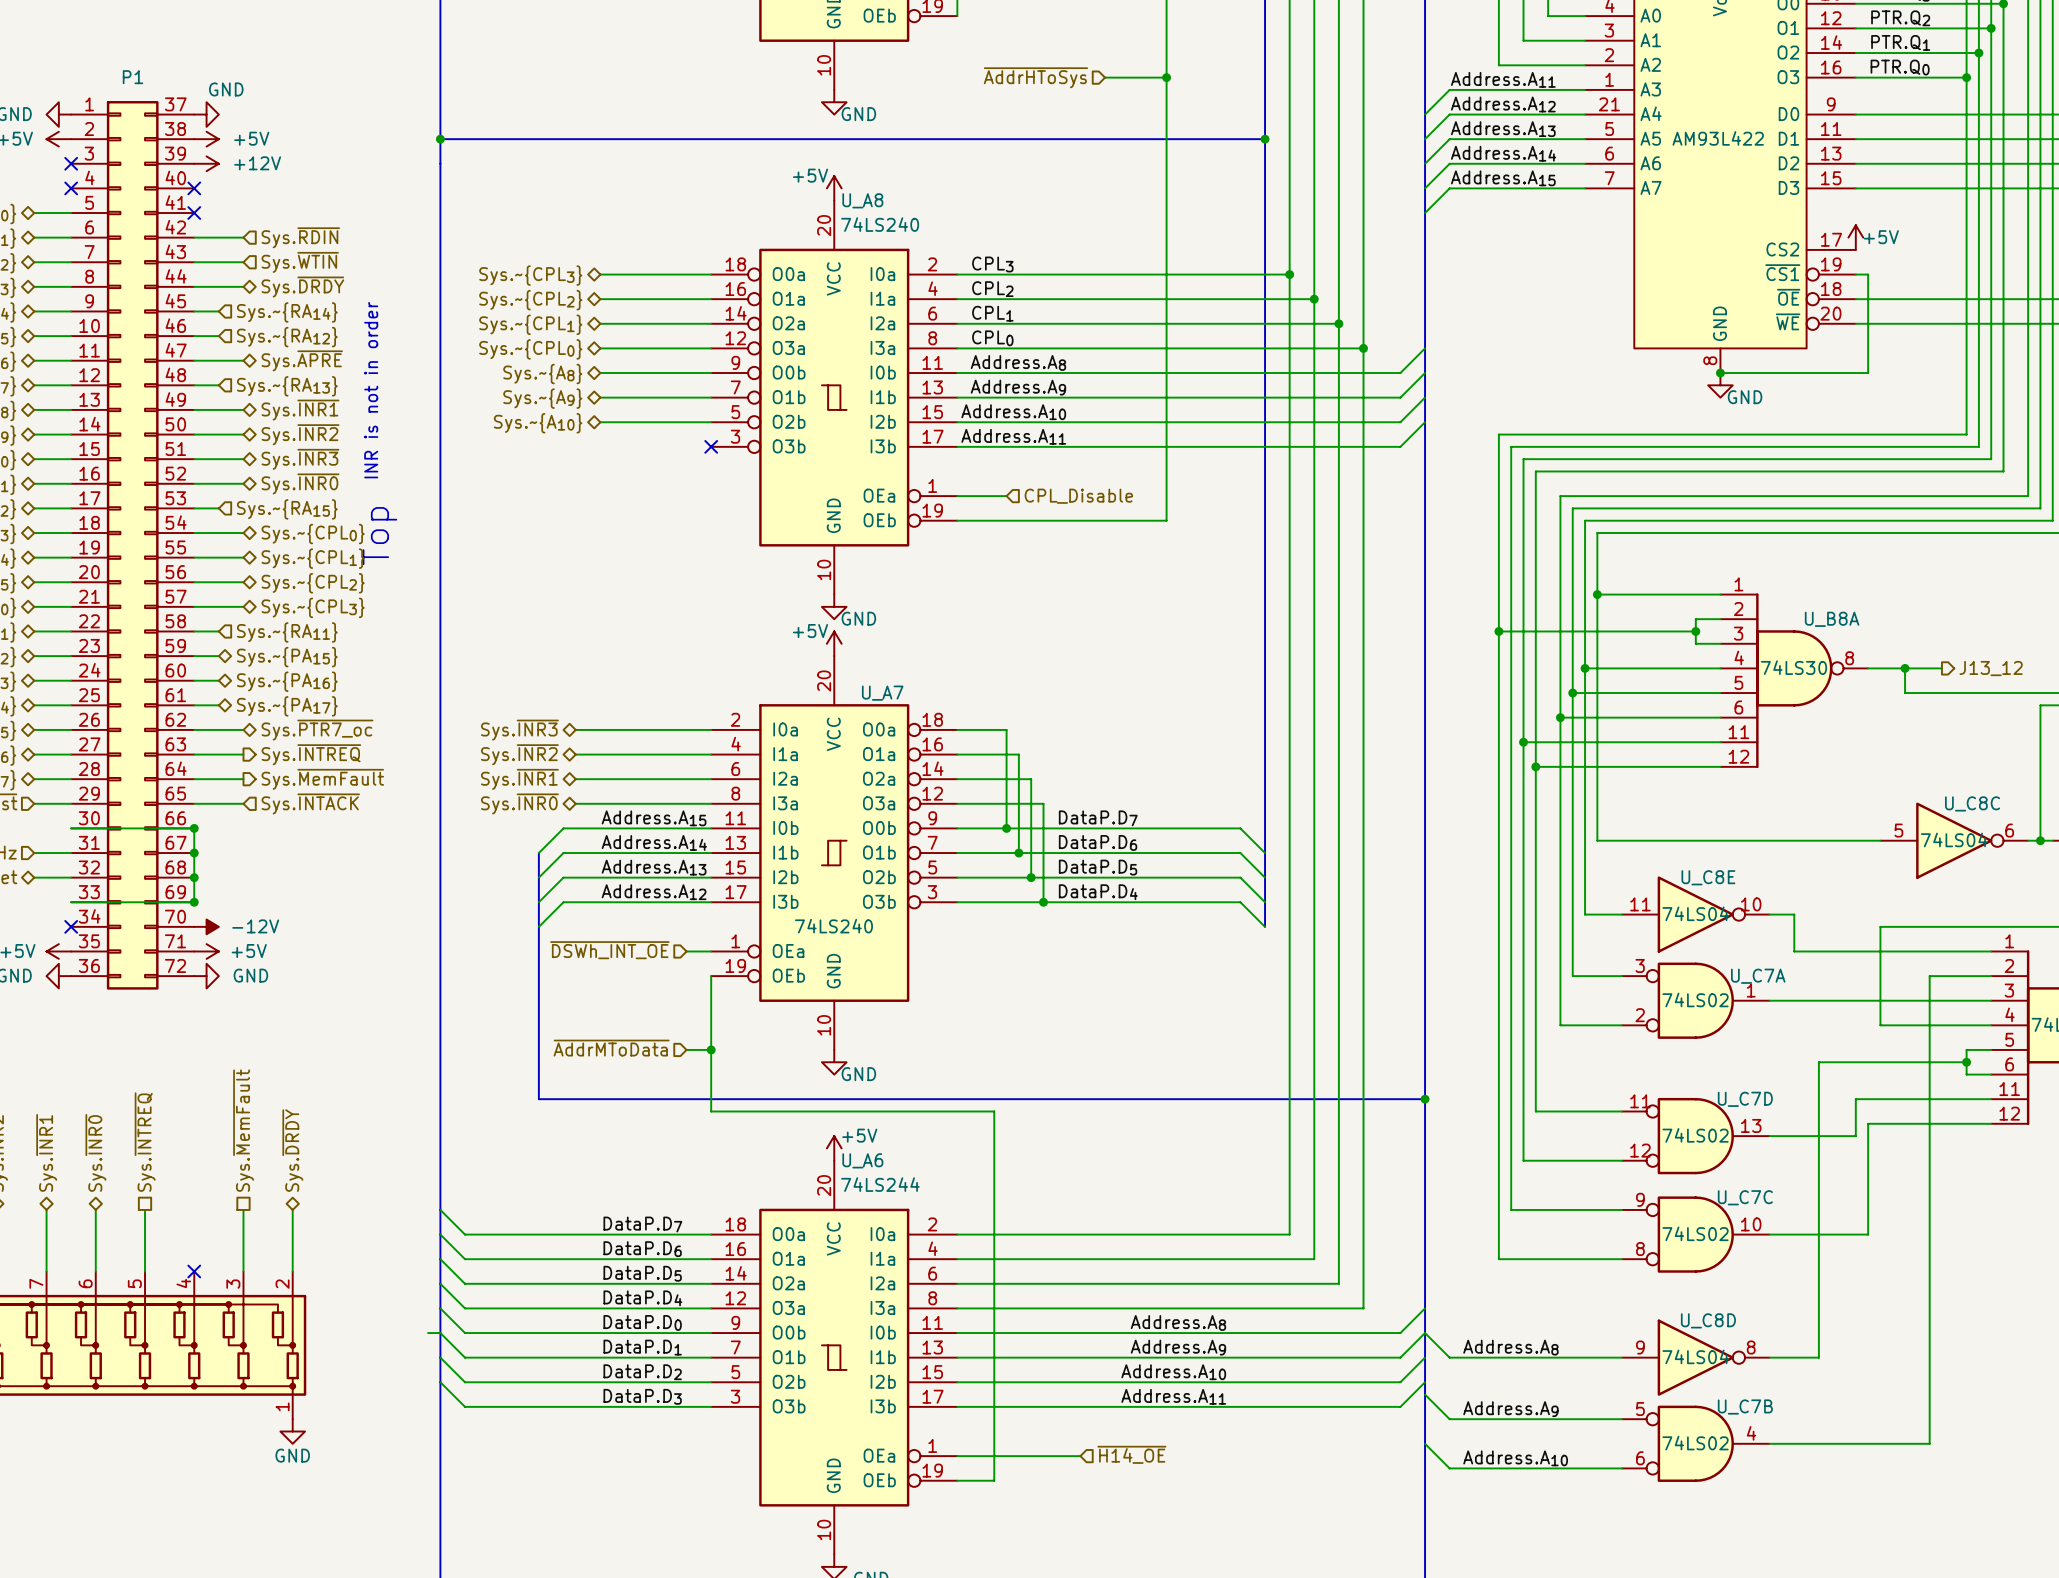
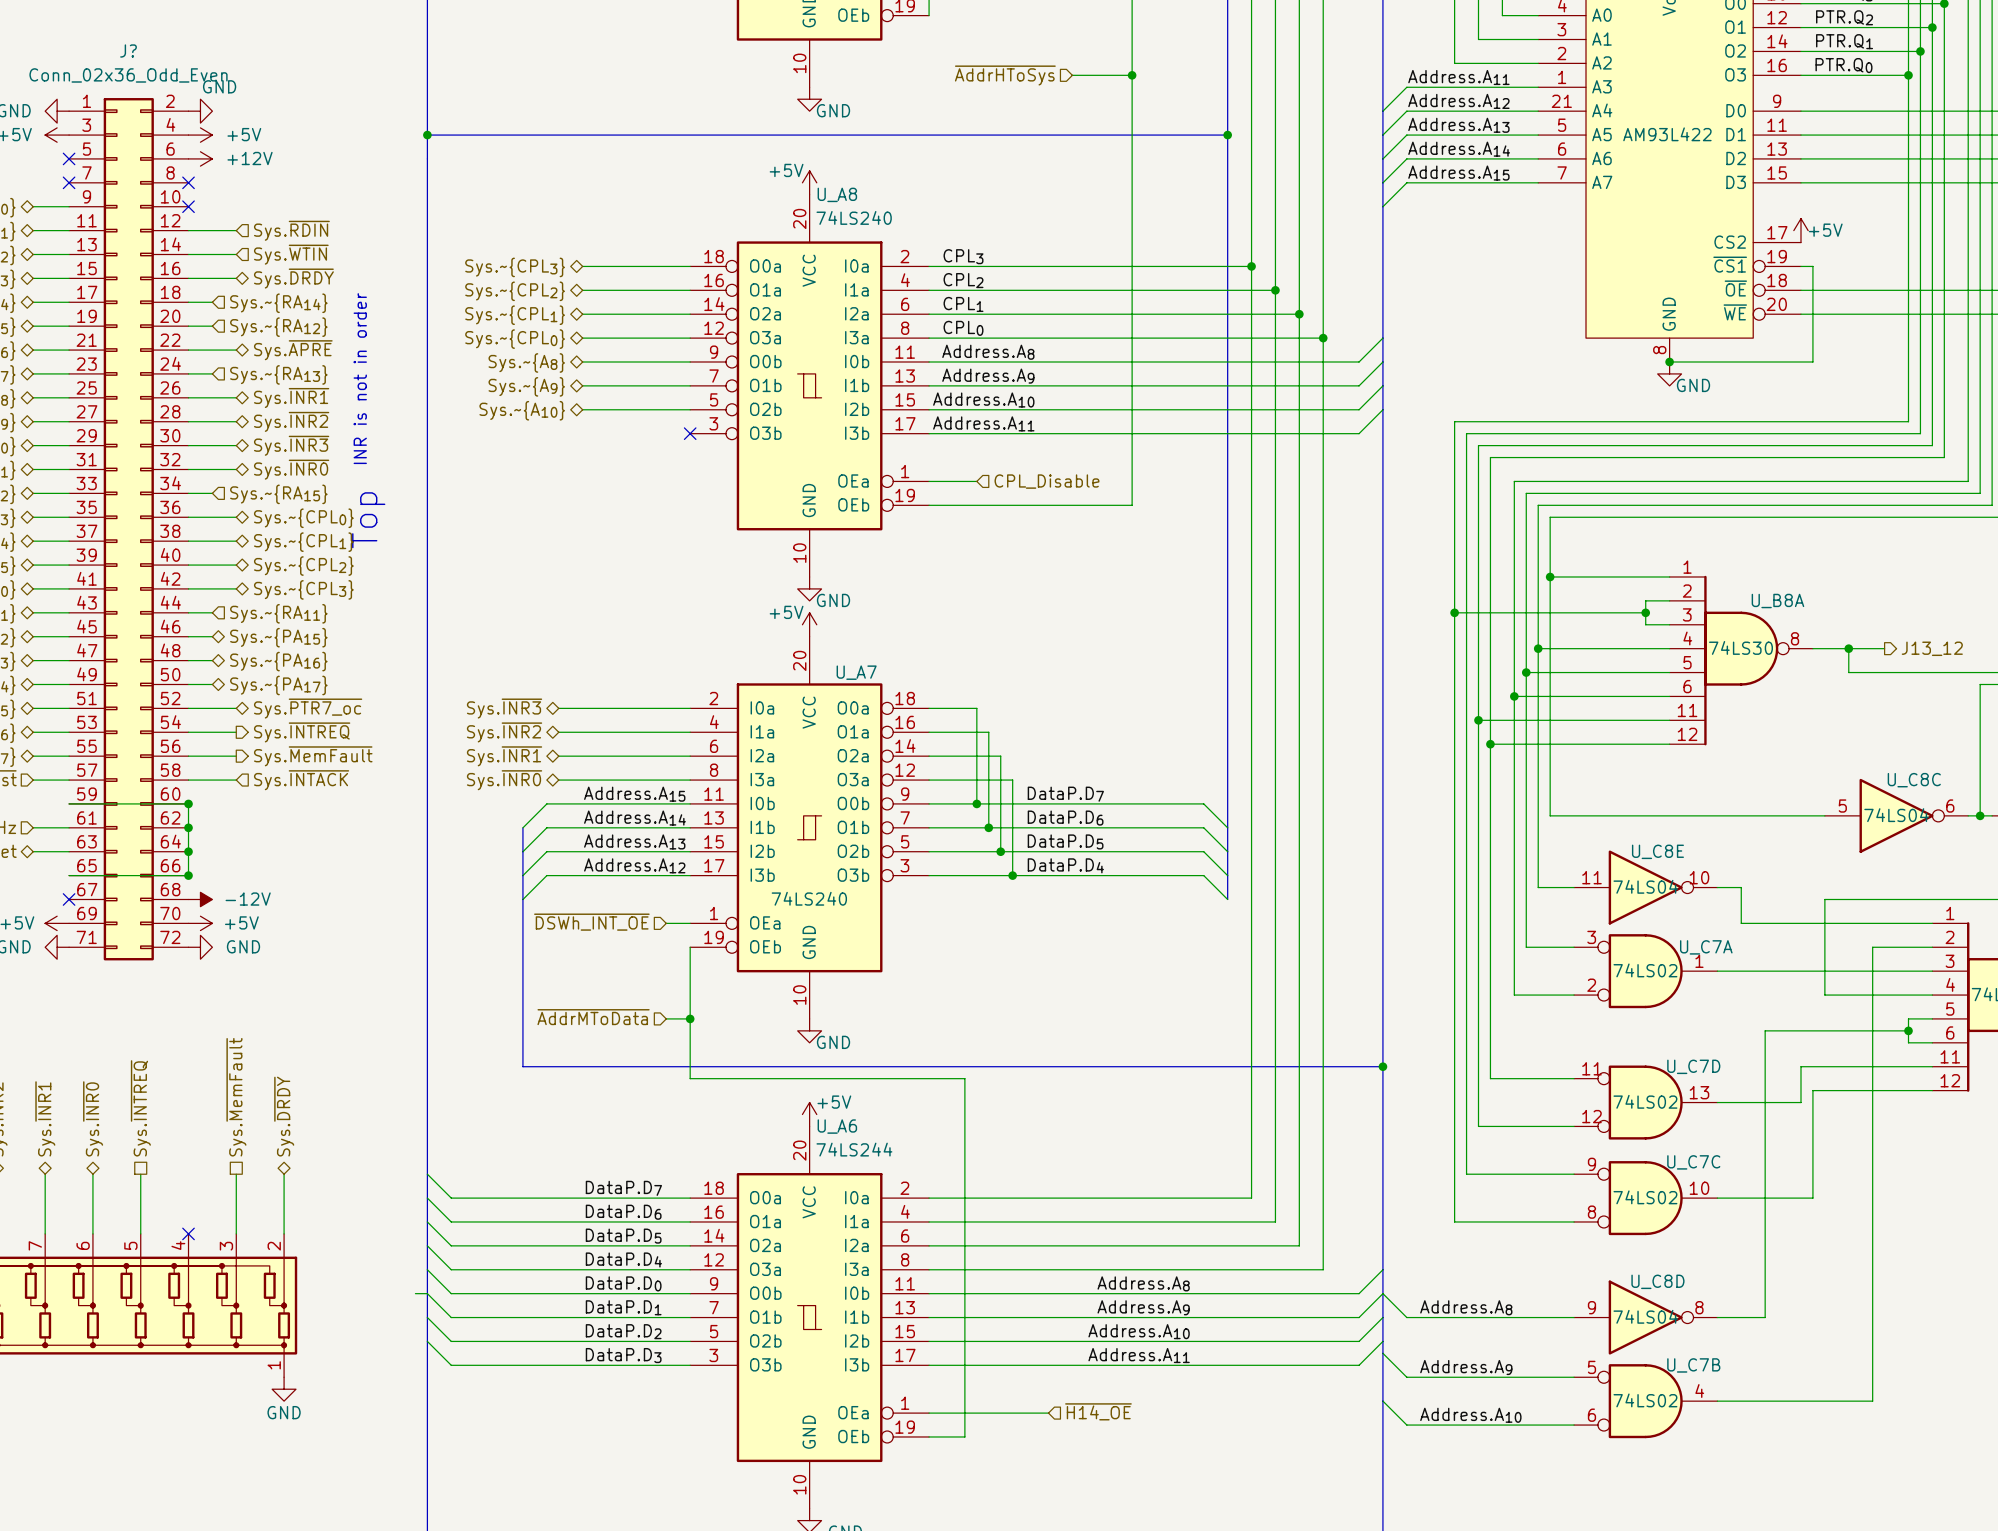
P1 value: none -> Conn_02x36_Odd_Even (128, 75)
P1 name: P1 (133, 77) -> J? (128, 50)
P1 symbol: [71, 101, 195, 990] -> [69, 98, 189, 961]

